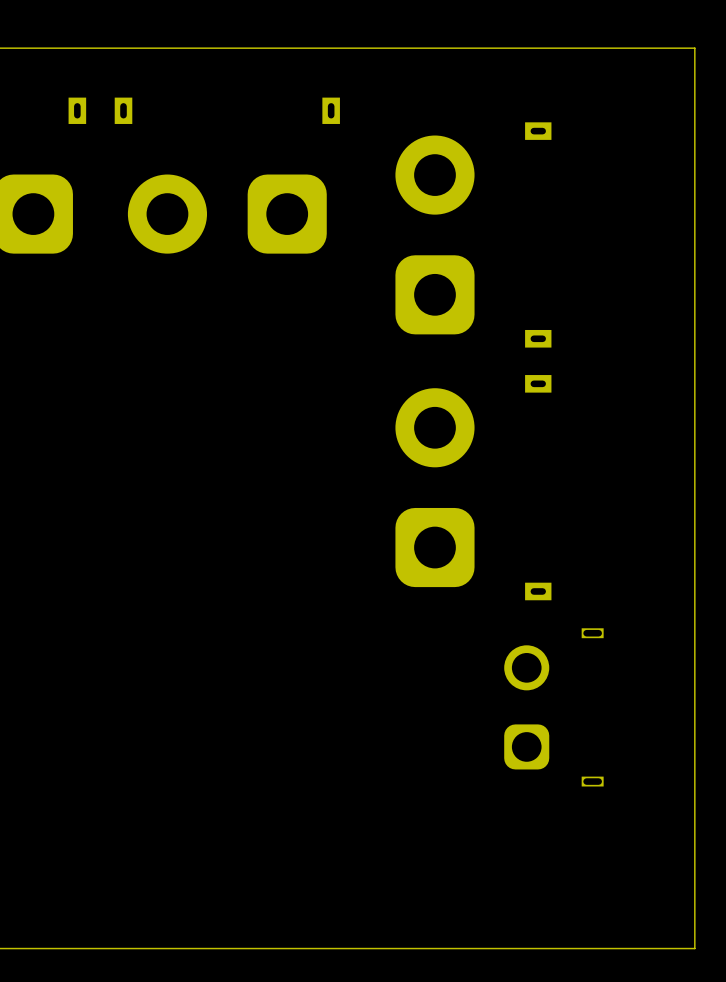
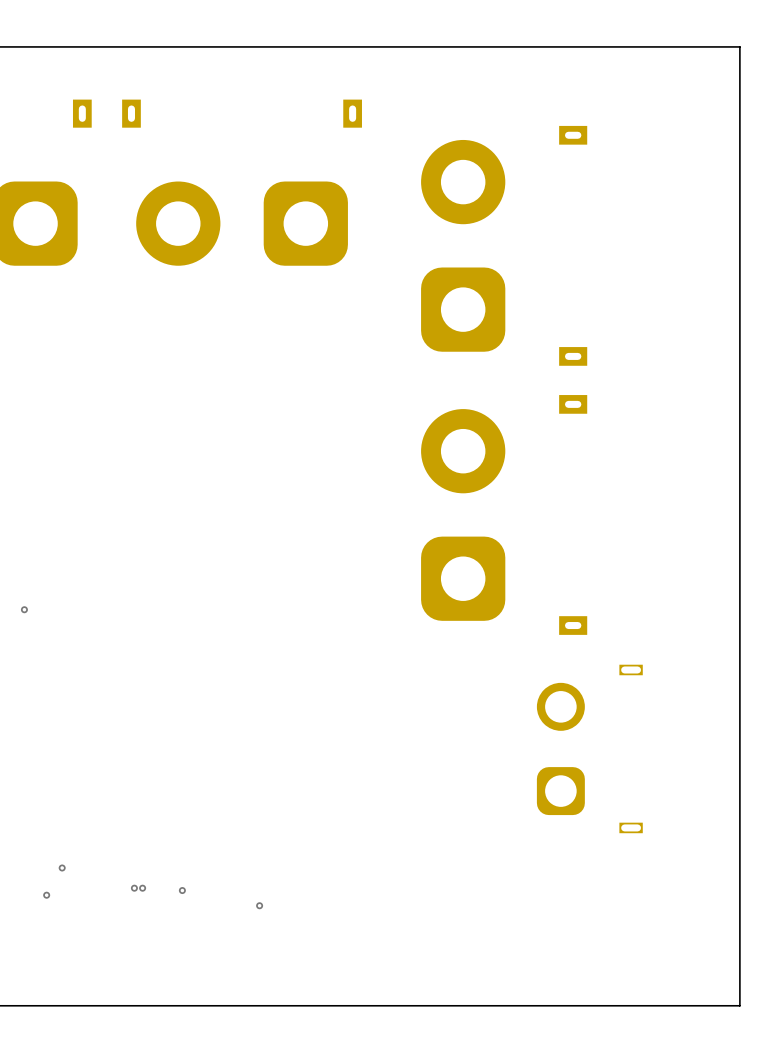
via: none -> (24, 609)
via: none -> (62, 867)
via: none -> (134, 888)
via: none -> (142, 888)
via: none -> (182, 890)
via: none -> (46, 895)
via: none -> (259, 905)

